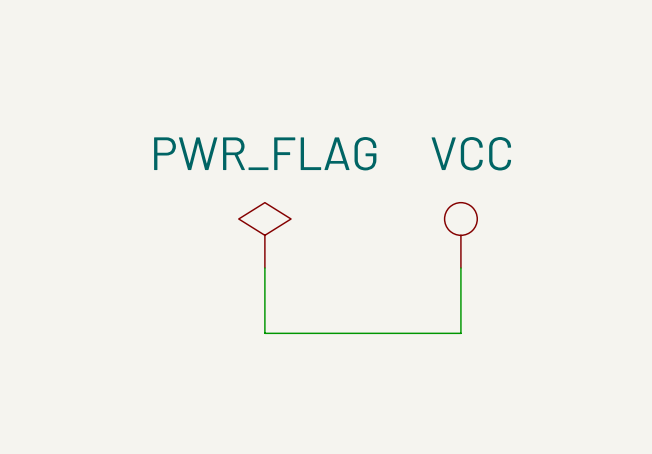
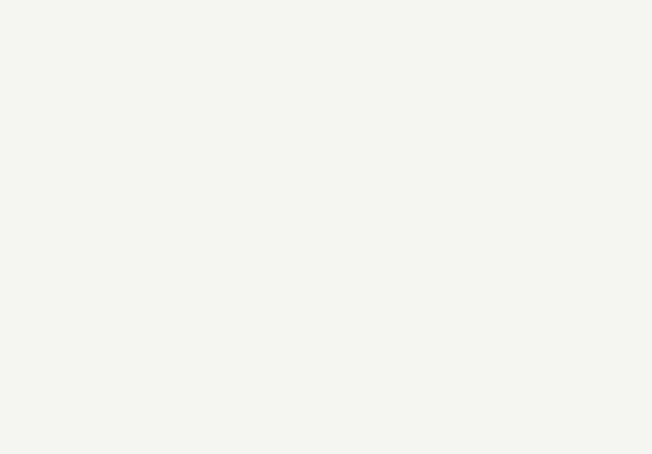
power symbol: PWR_FLAG (264, 235) -> none
power symbol: VCC (460, 235) -> none
wire: (264, 268) (264, 333) (460, 333) (460, 268) -> none

